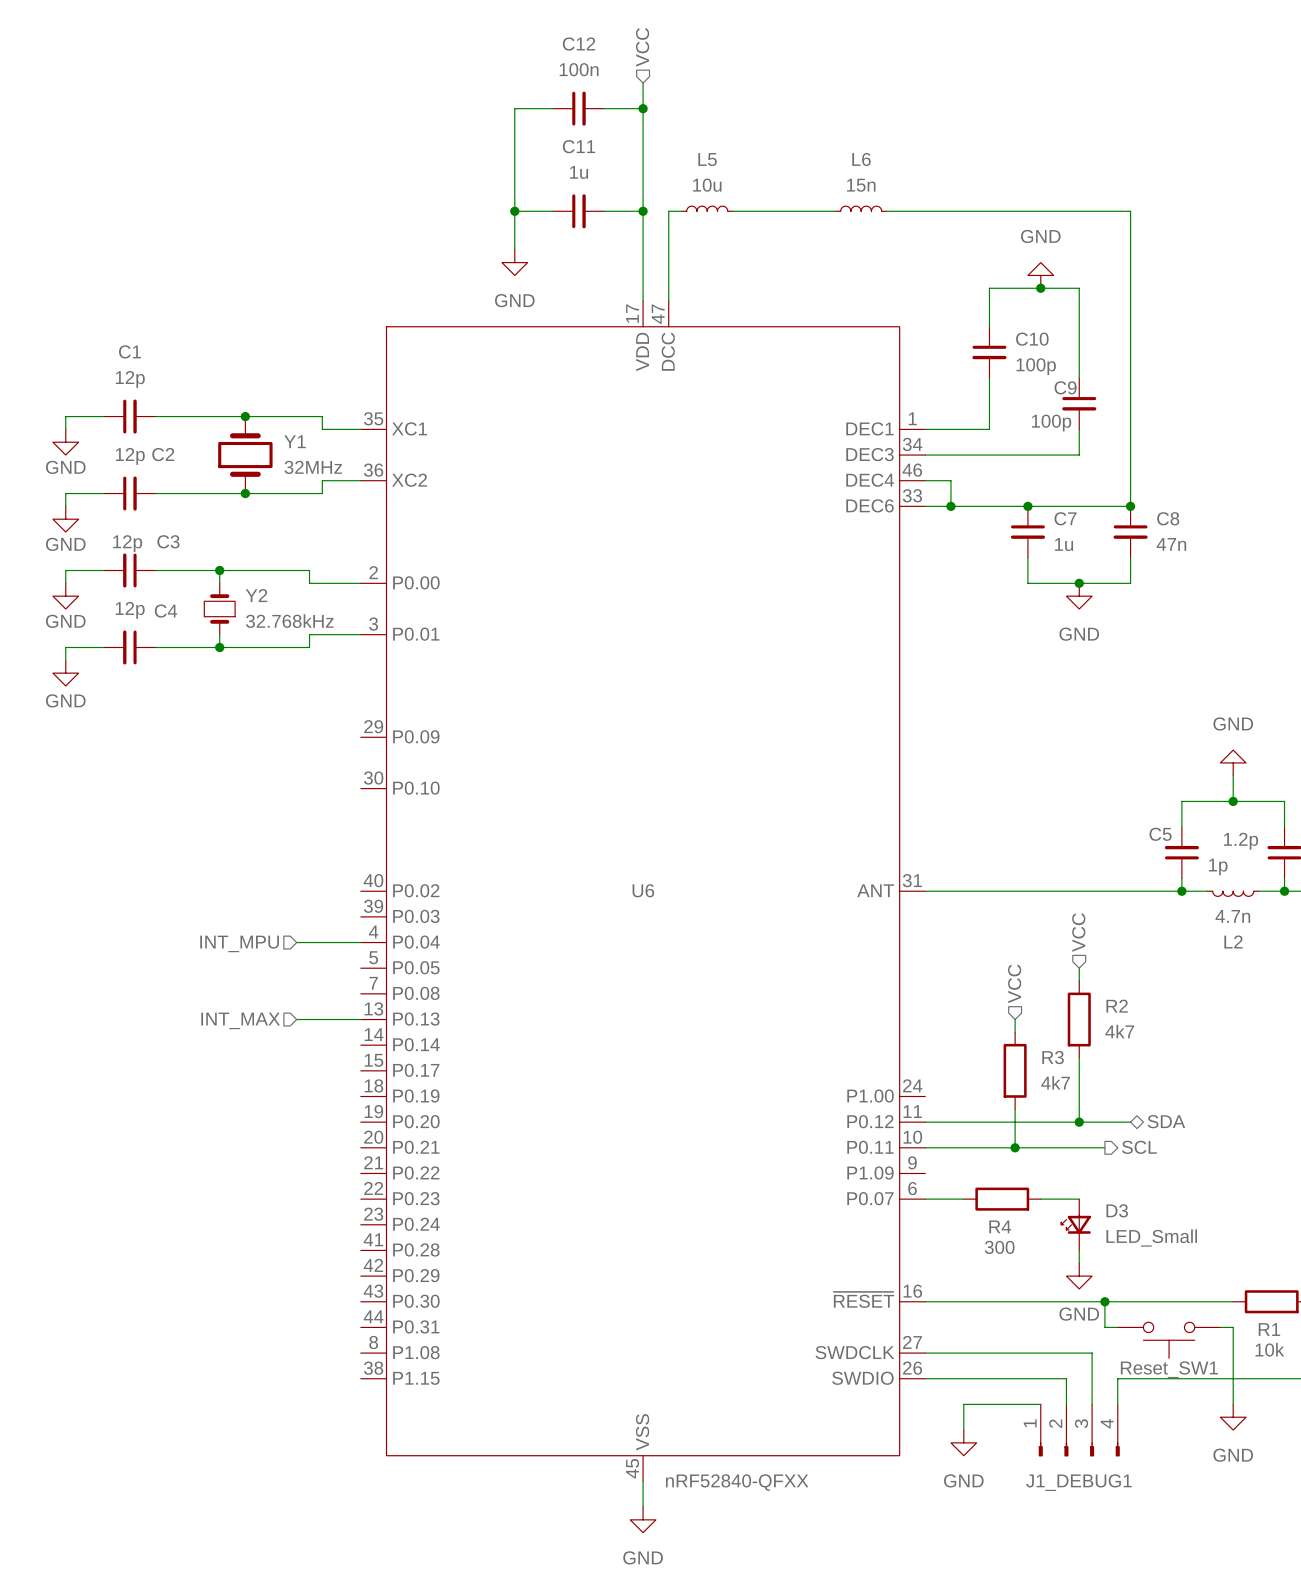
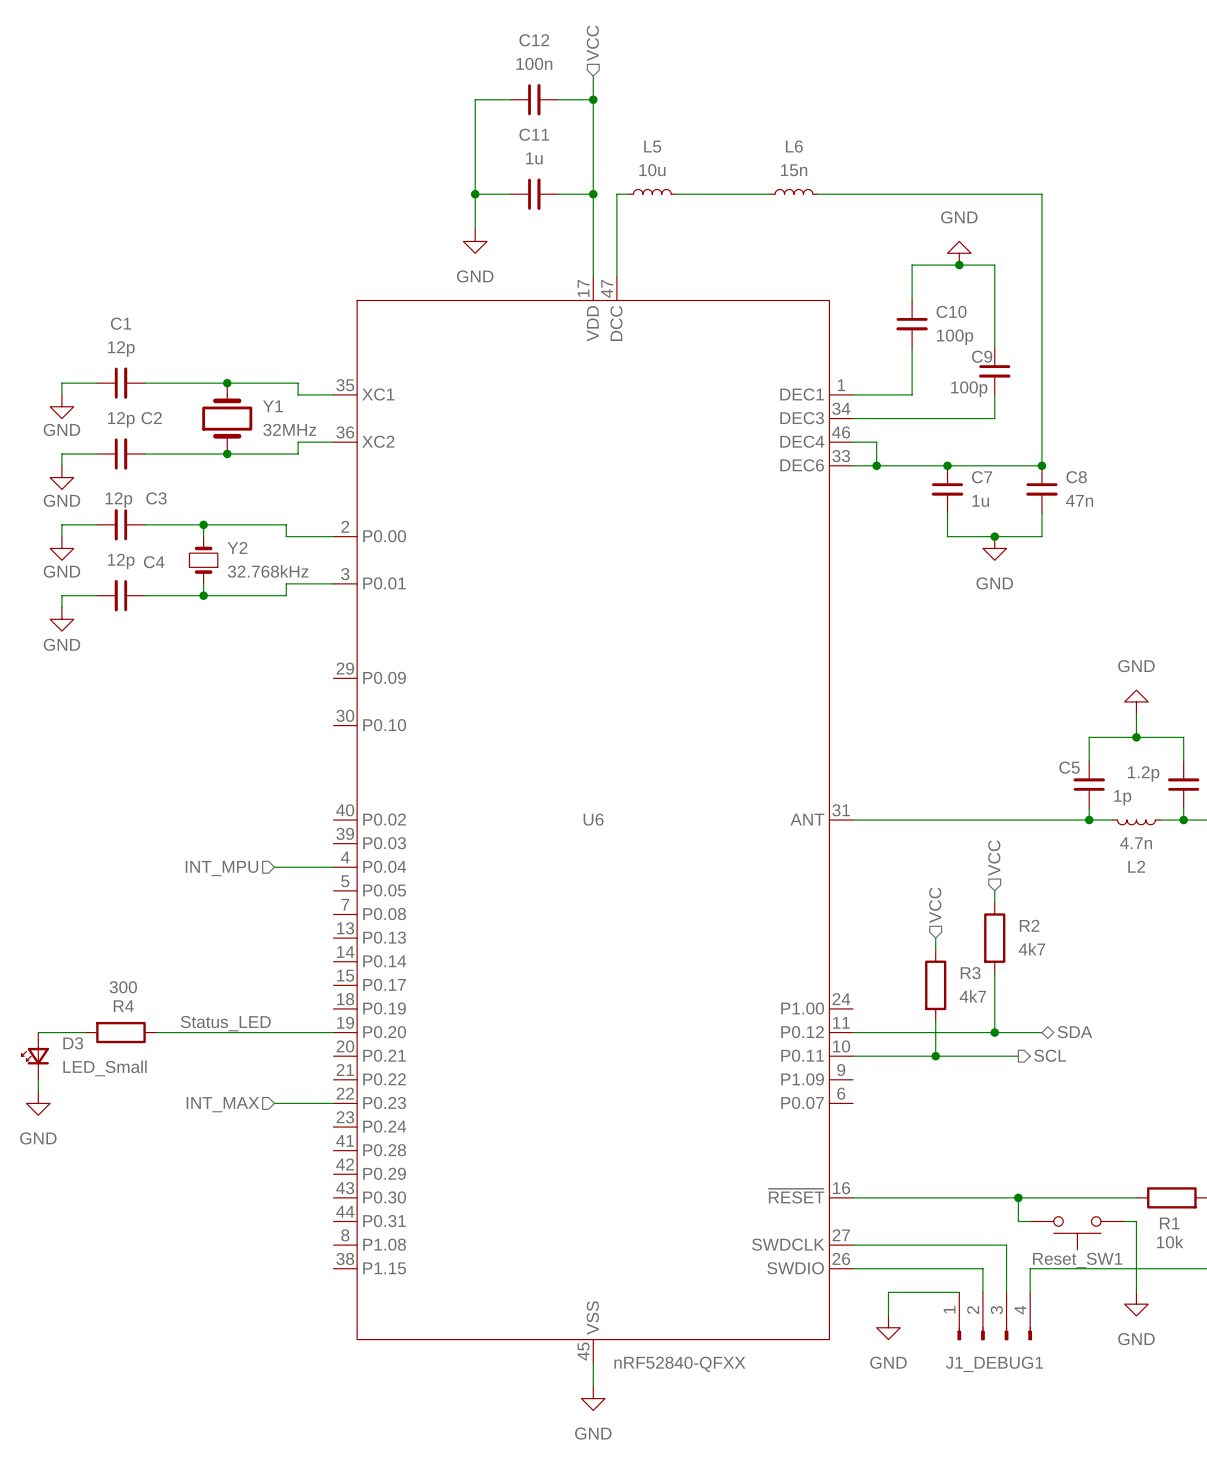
wire: (296, 1019) (360, 1019) -> (274, 1103) (333, 1103)
hierarchical label position: INT_MAX (240, 1020) -> INT_MAX (222, 1104)
label: none -> Status_LED (225, 1023)
wire: none -> (38, 1032) (85, 1032)
wire: none -> (156, 1032) (333, 1032)
wire: none -> (38, 1079) (38, 1091)
power symbol: none -> GND (38, 1103)
wire: (925, 1199) (963, 1199) -> none
R4 position: (1002, 1199) -> (120, 1032)
wire: (1040, 1199) (1079, 1199) -> none
D3 position: (1076, 1224) -> (35, 1056)
R4 name position: R4 (1000, 1226) -> R4 (123, 1006)
R4 value position: 300 (999, 1247) -> 300 (123, 987)
wire: (1079, 1250) (1079, 1263) -> none
power symbol: GND (1079, 1276) -> none

